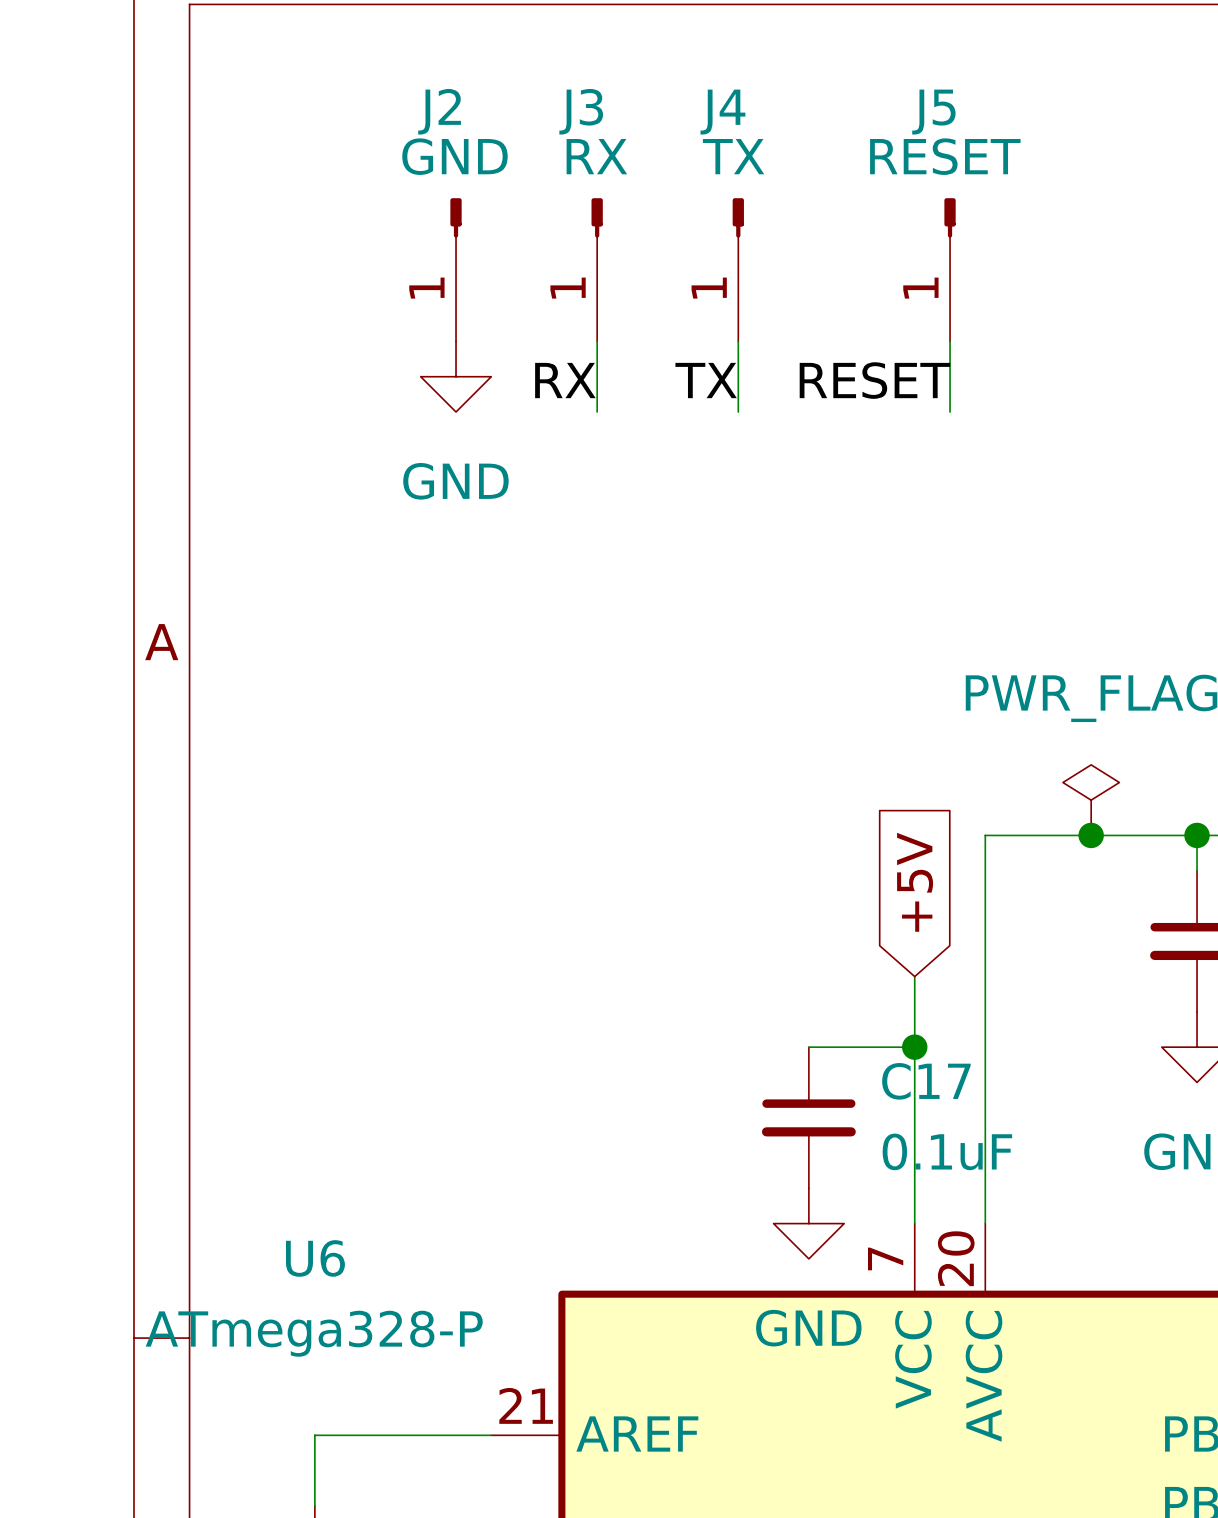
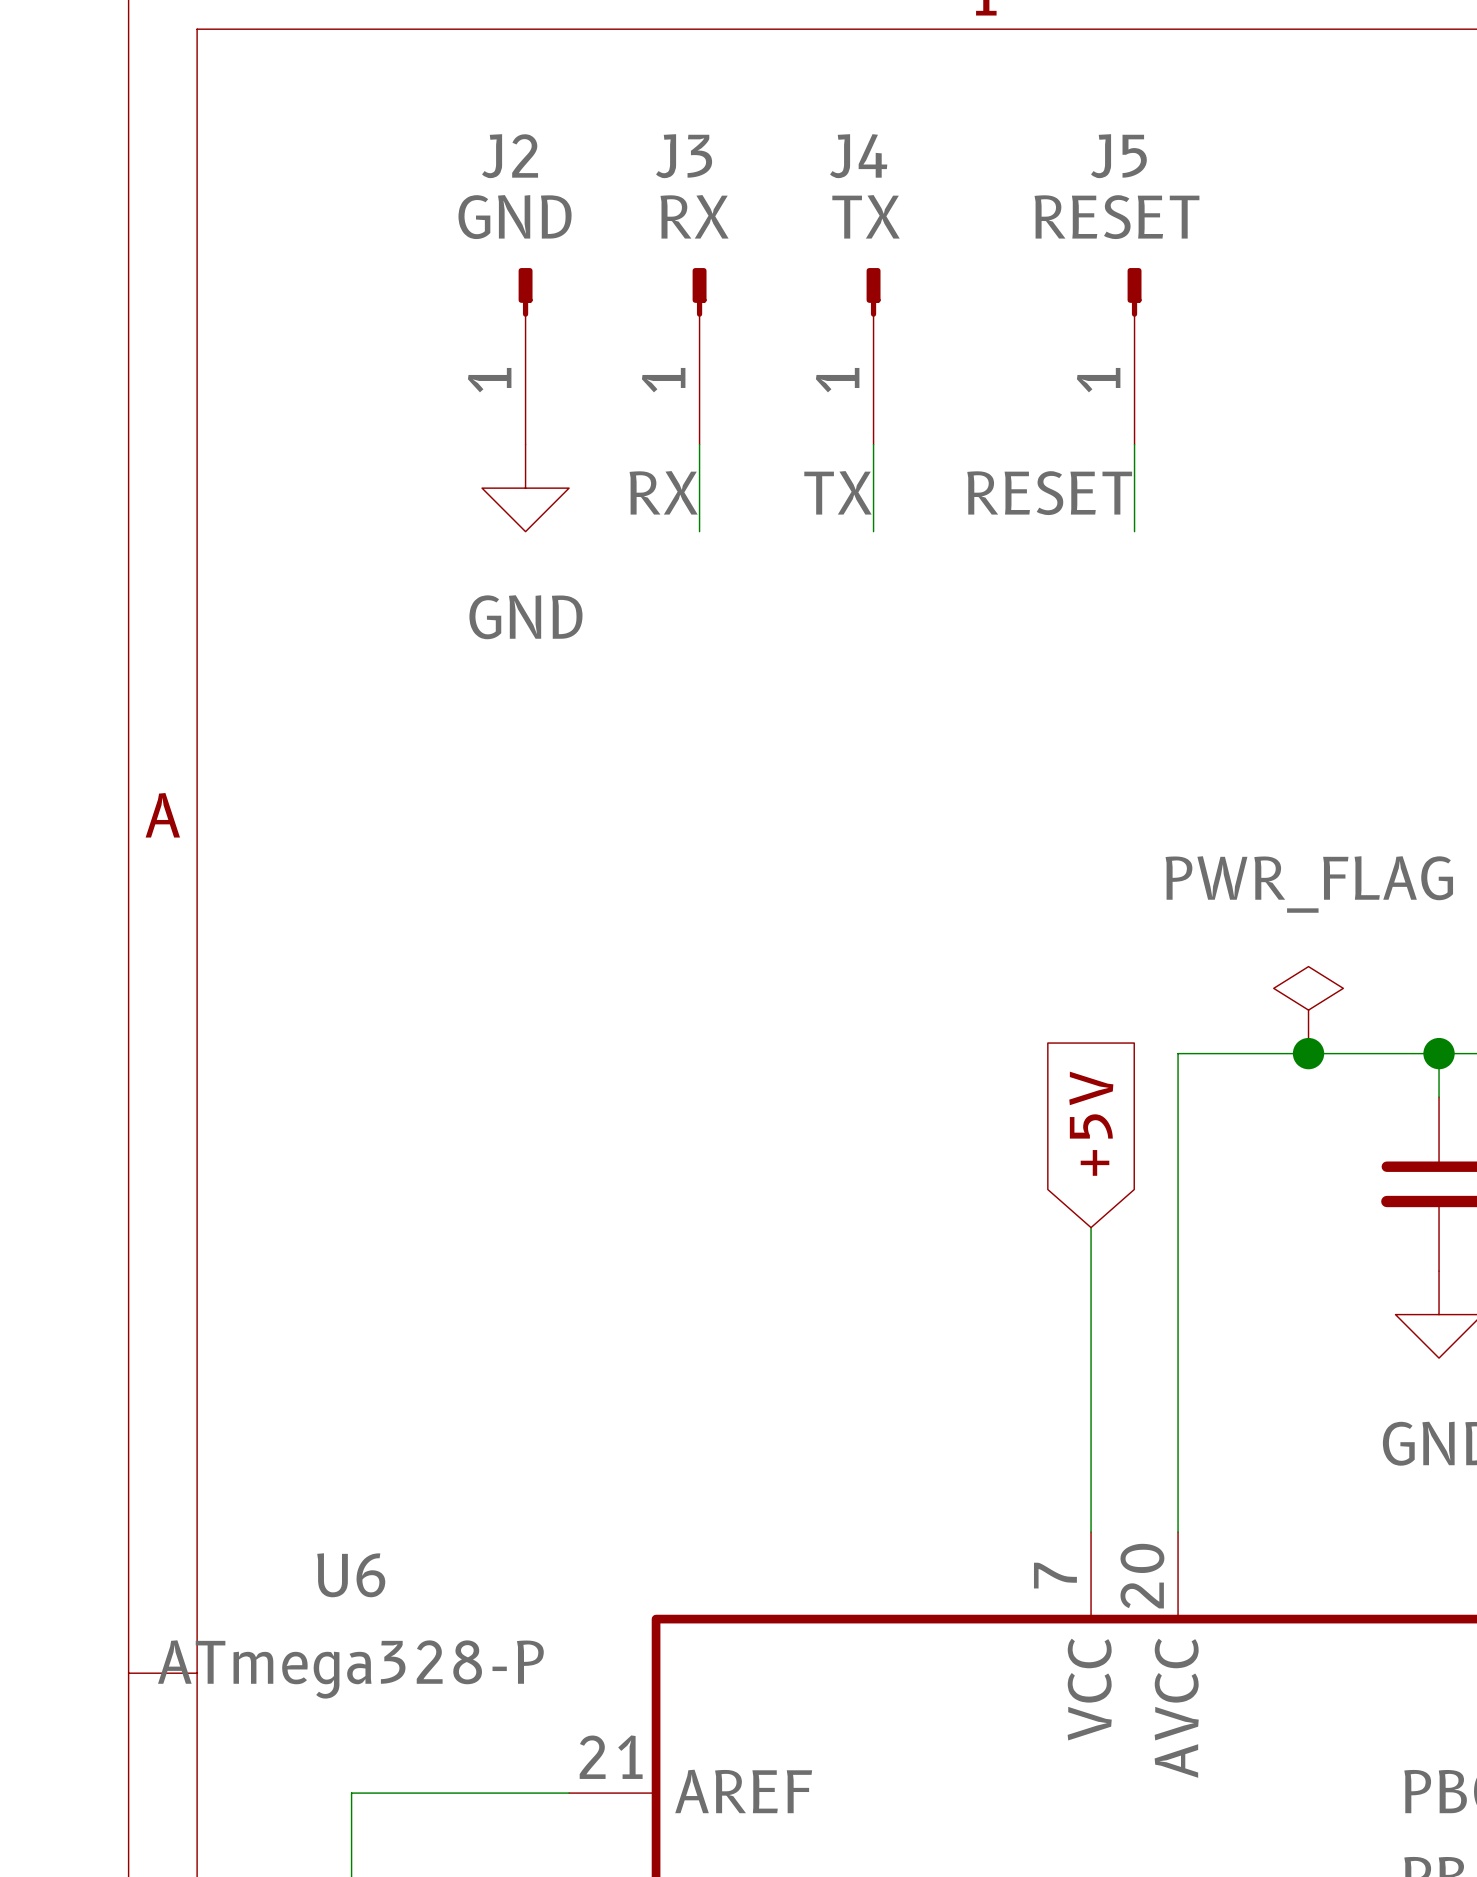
wire: (808, 1047) (914, 1047) -> none
junction: (914, 1047) -> none
C17: 0.1uF (808, 1117) -> none
power symbol: GND (808, 1223) -> none

